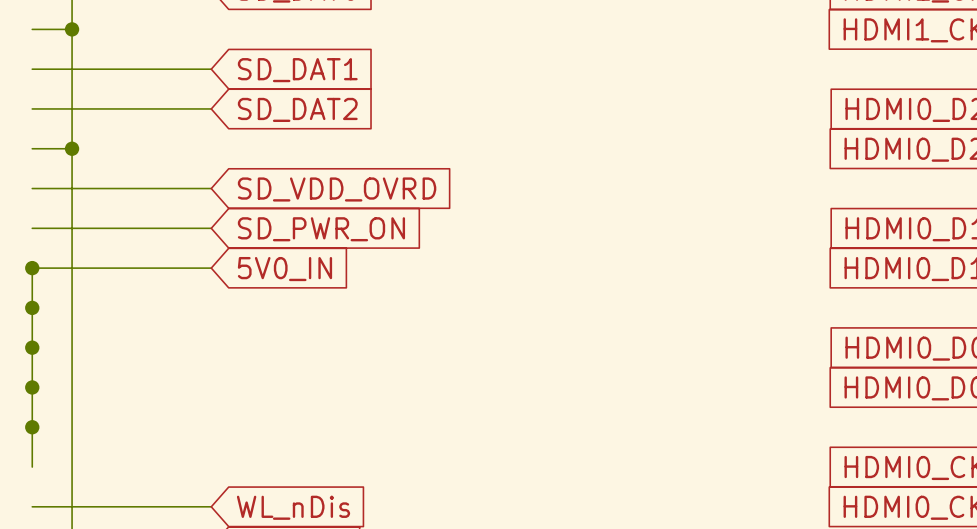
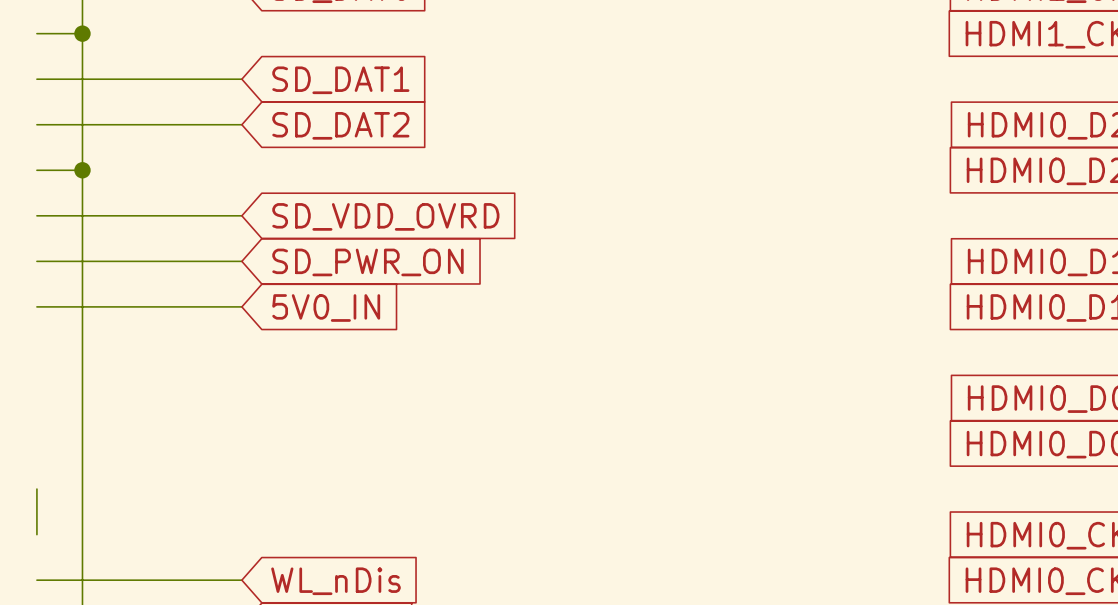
wire: (32, 268) (32, 427) -> none
junction: (32, 268) -> none
junction: (32, 307) -> none
junction: (32, 347) -> none
junction: (32, 387) -> none
junction: (32, 427) -> none

